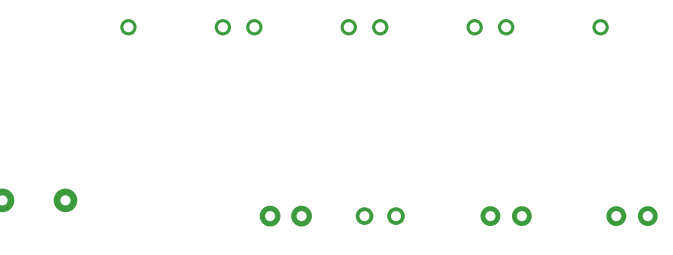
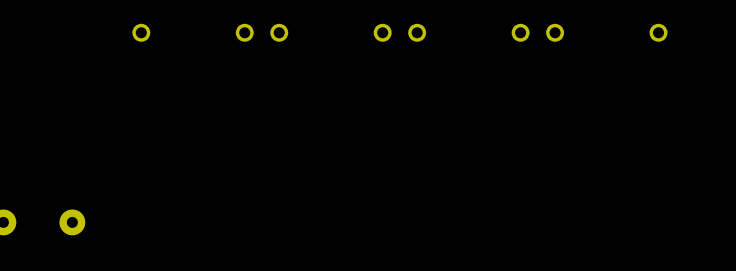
part: (285, 216) -> none
part: (380, 216) -> none
part: (506, 216) -> none
part: (632, 216) -> none

